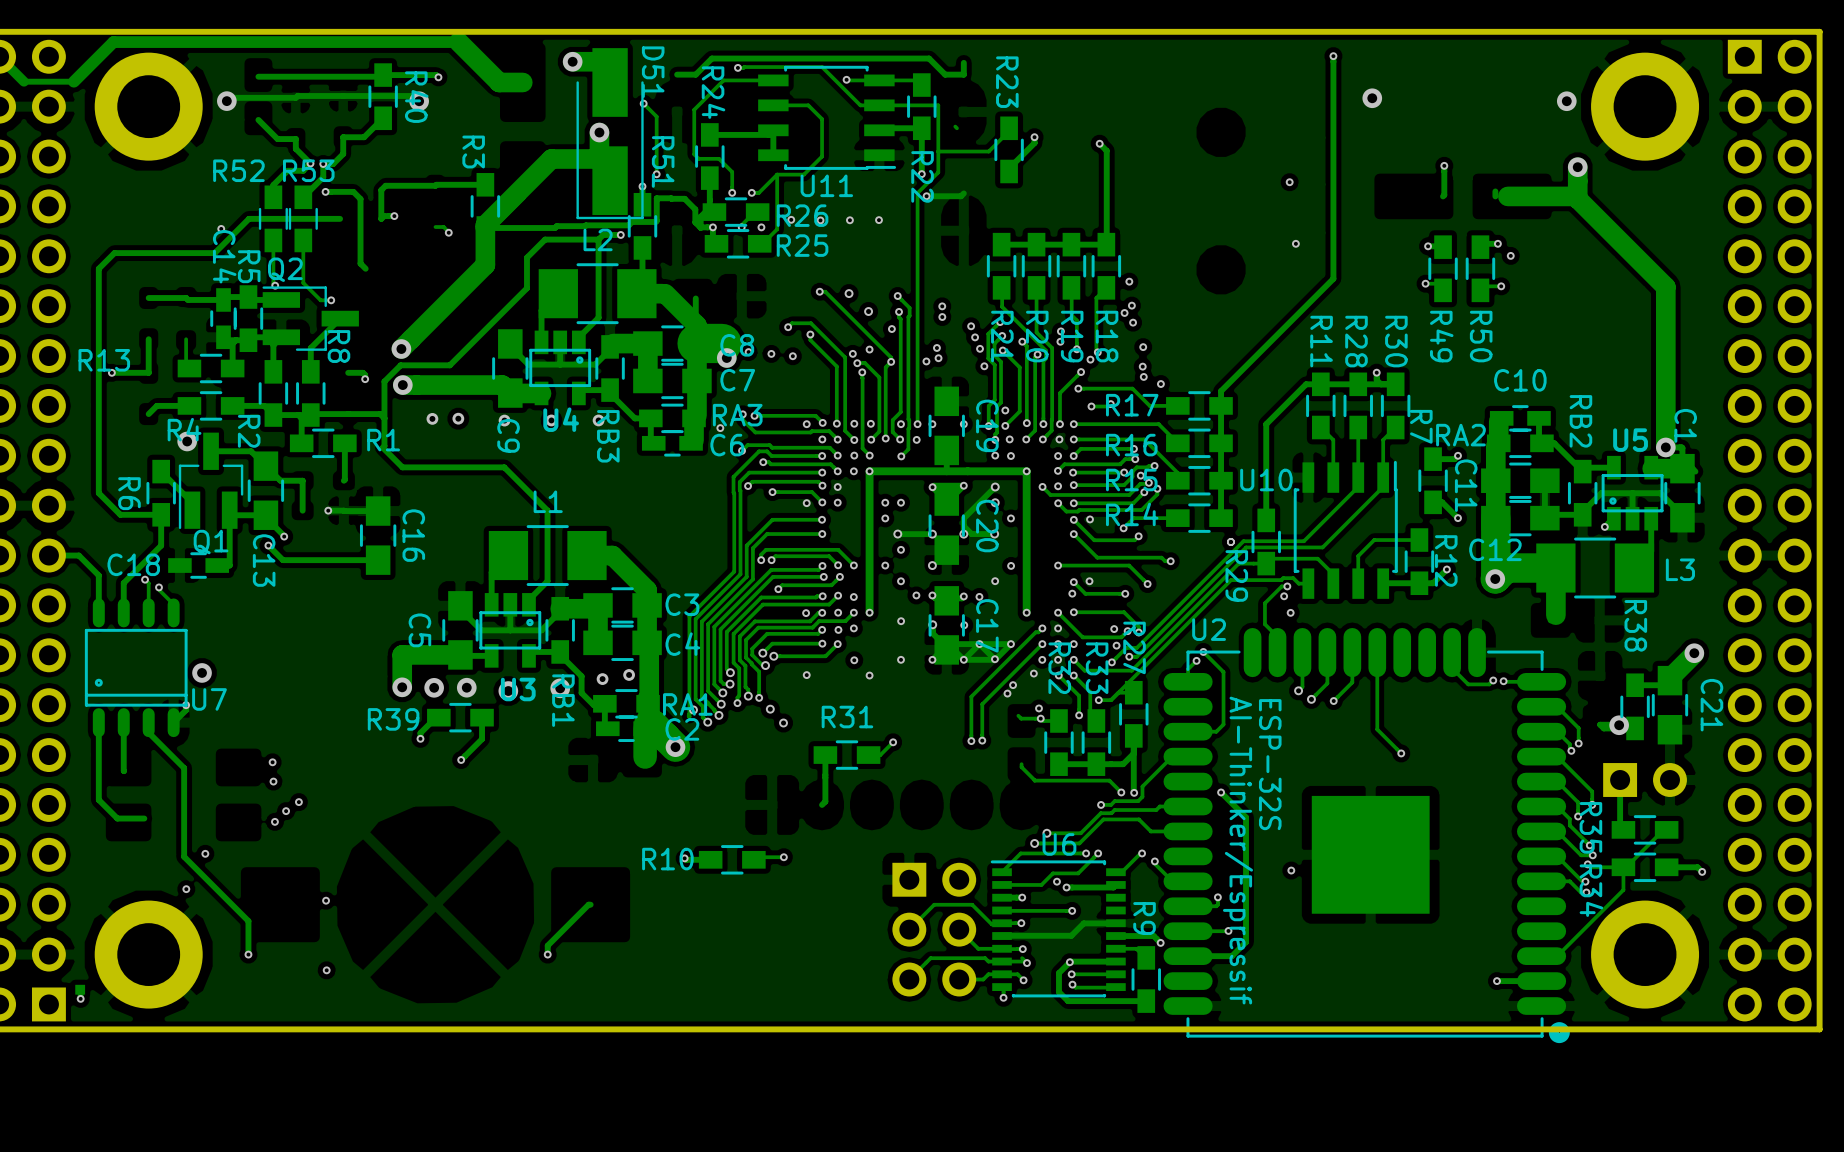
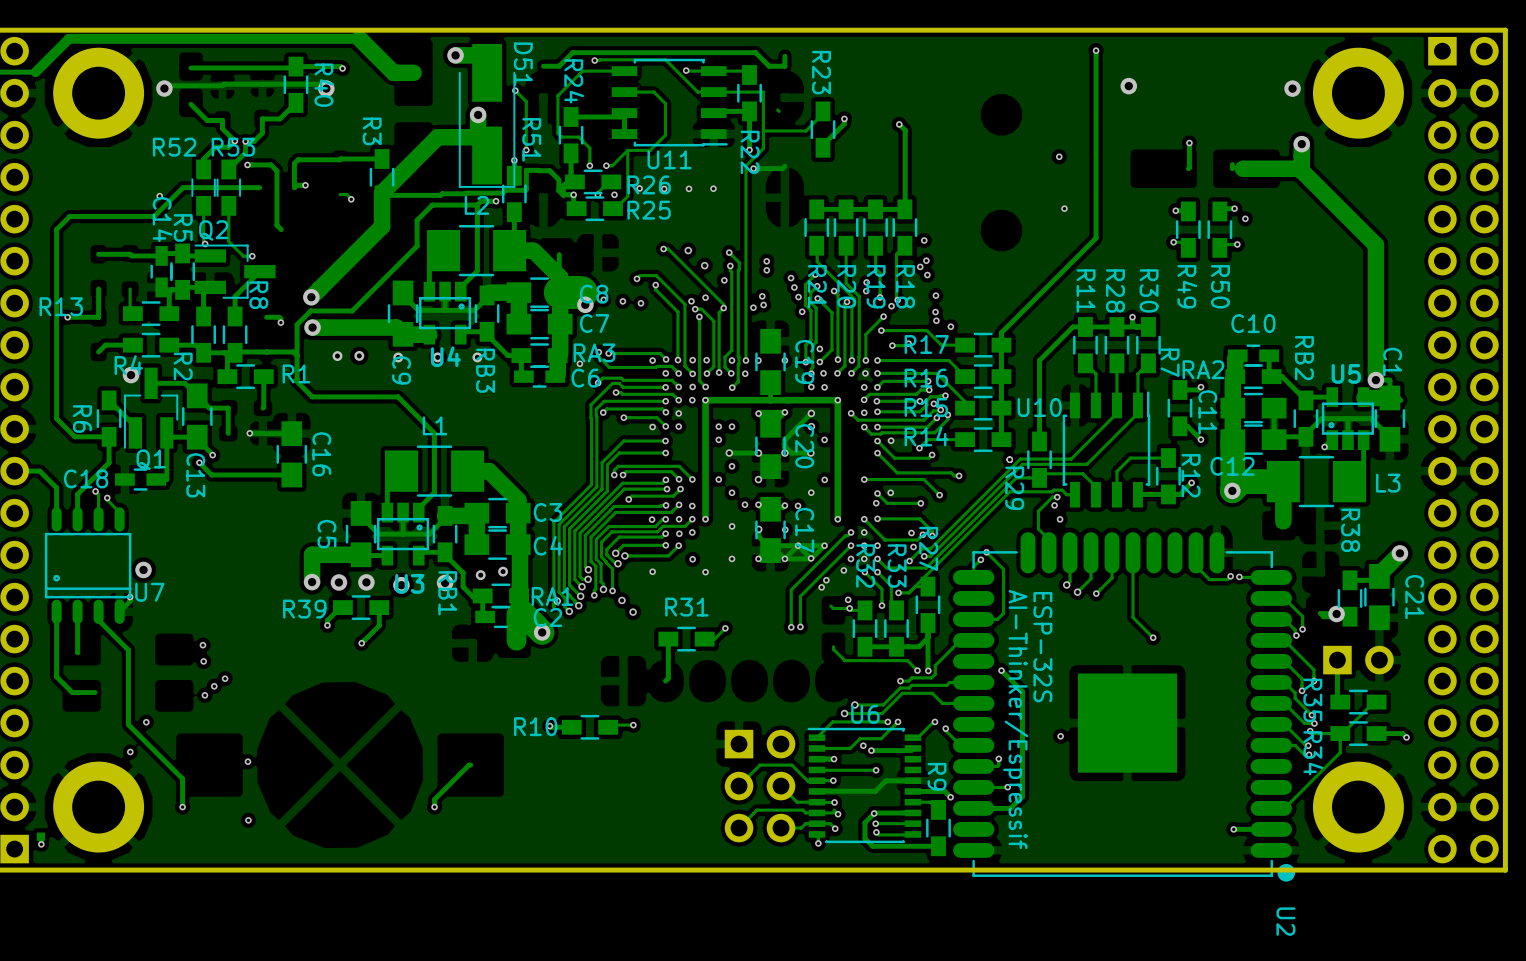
U2 name rotation: 0° (1209, 629) -> 90° clockwise (1285, 921)
U2 name position: U2 (1209, 629) -> U2 (1285, 921)

